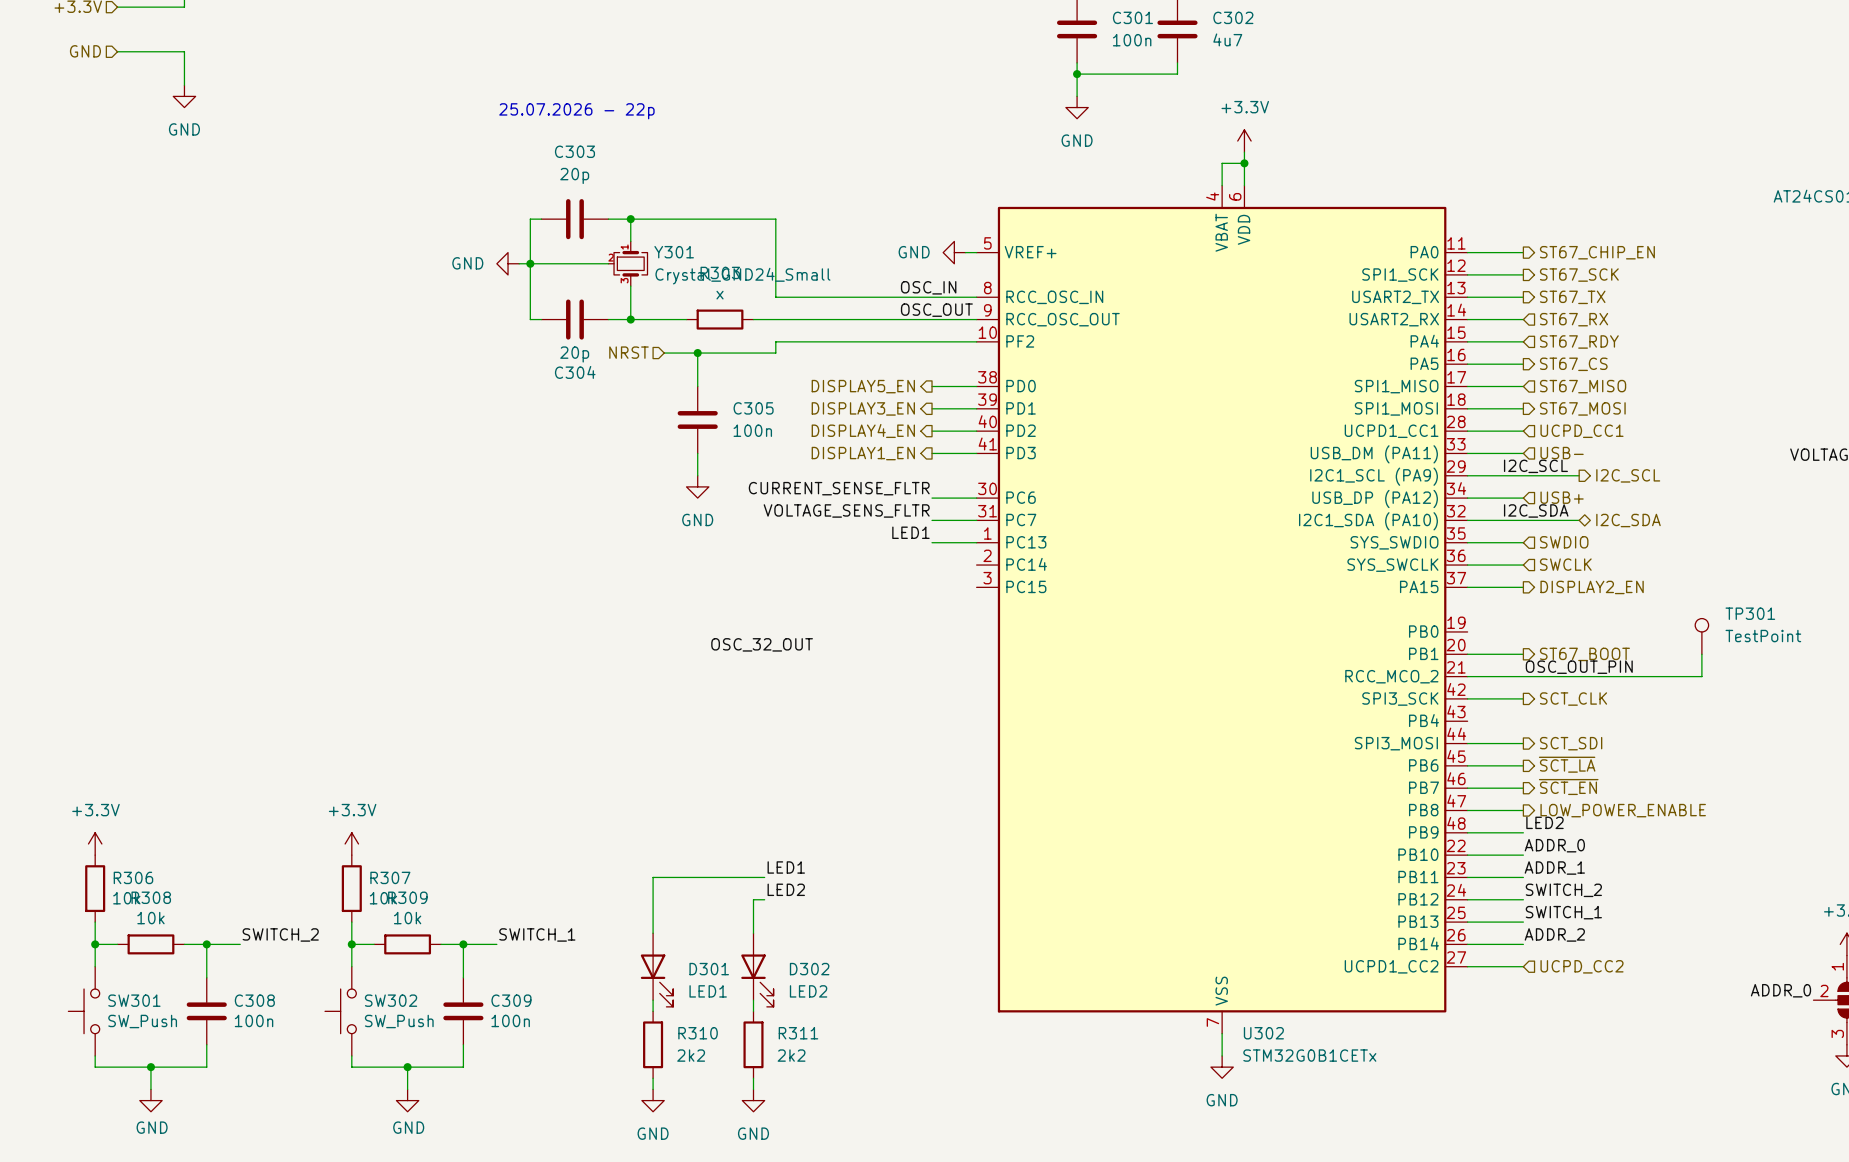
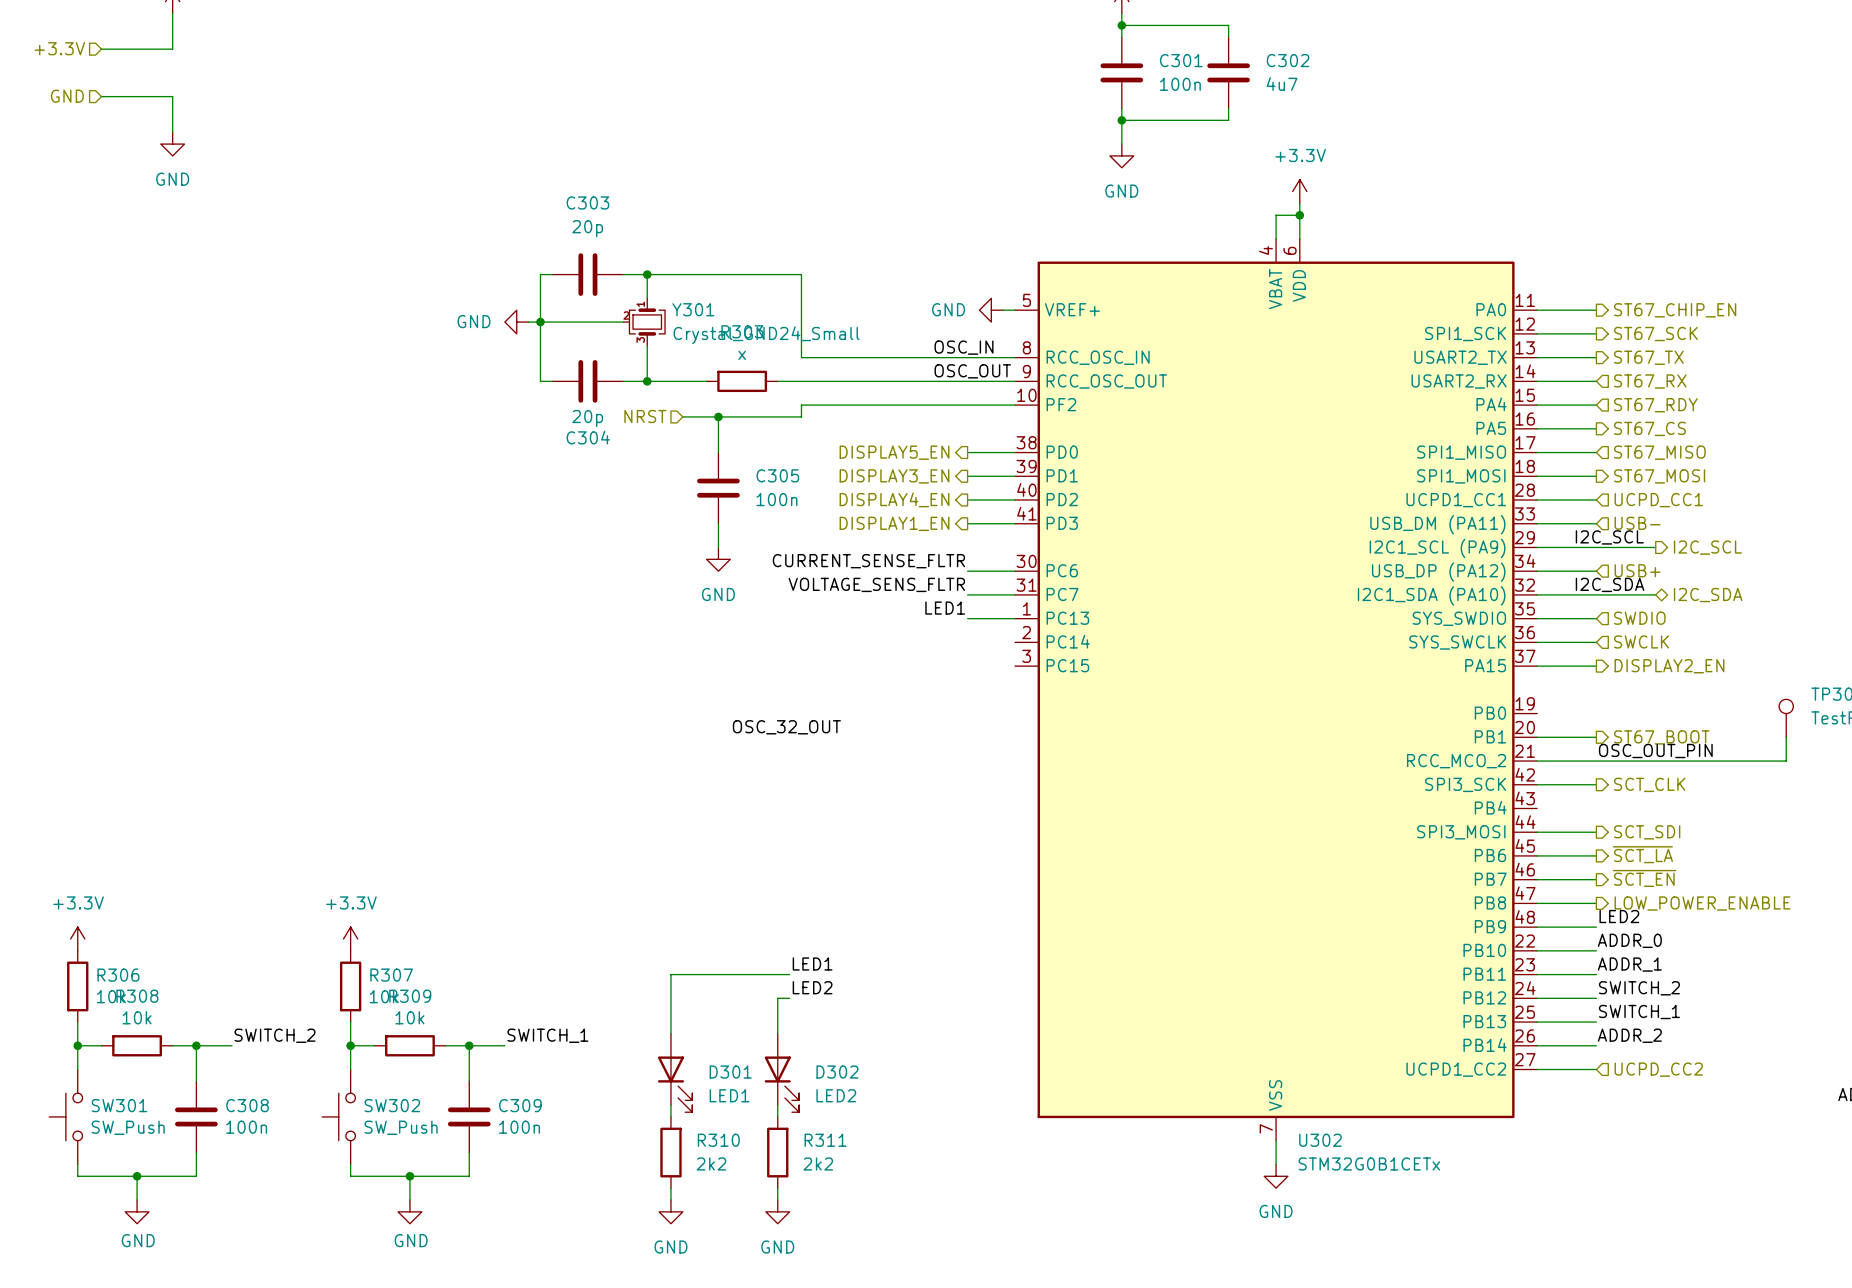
text: 25.07.2026 - 22p (576, 111) -> none

